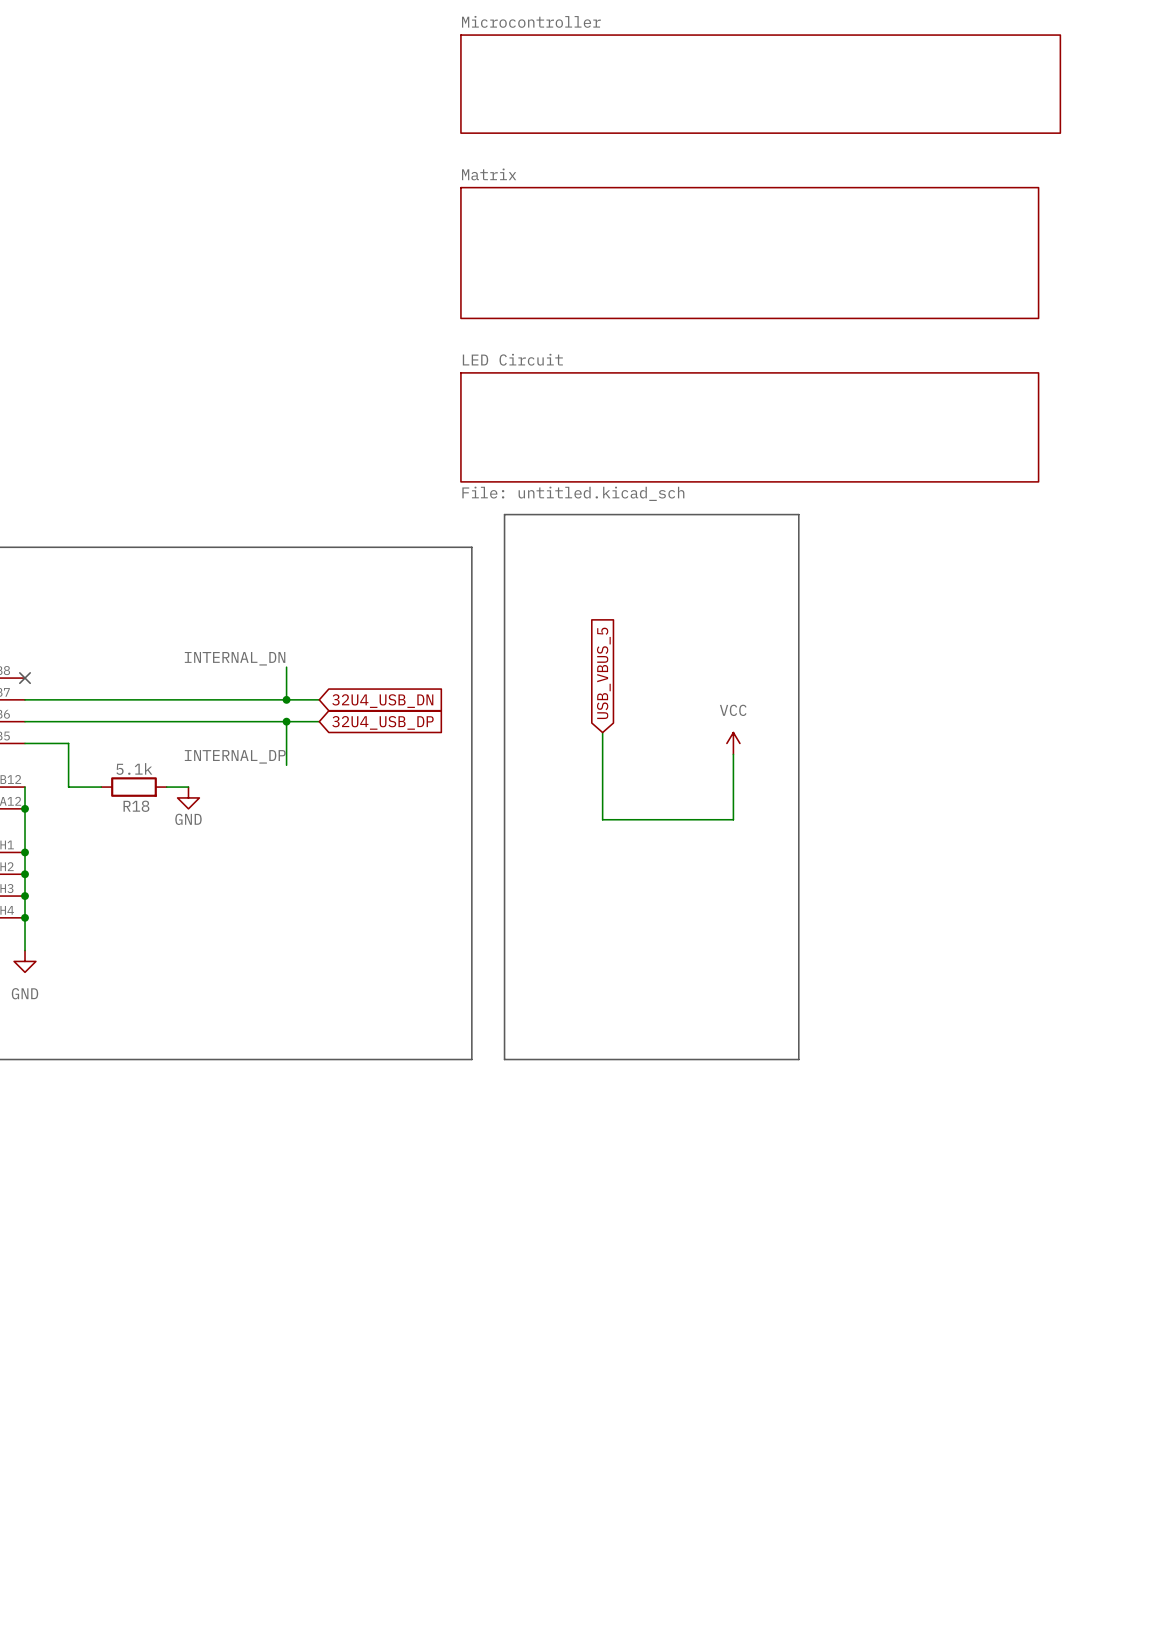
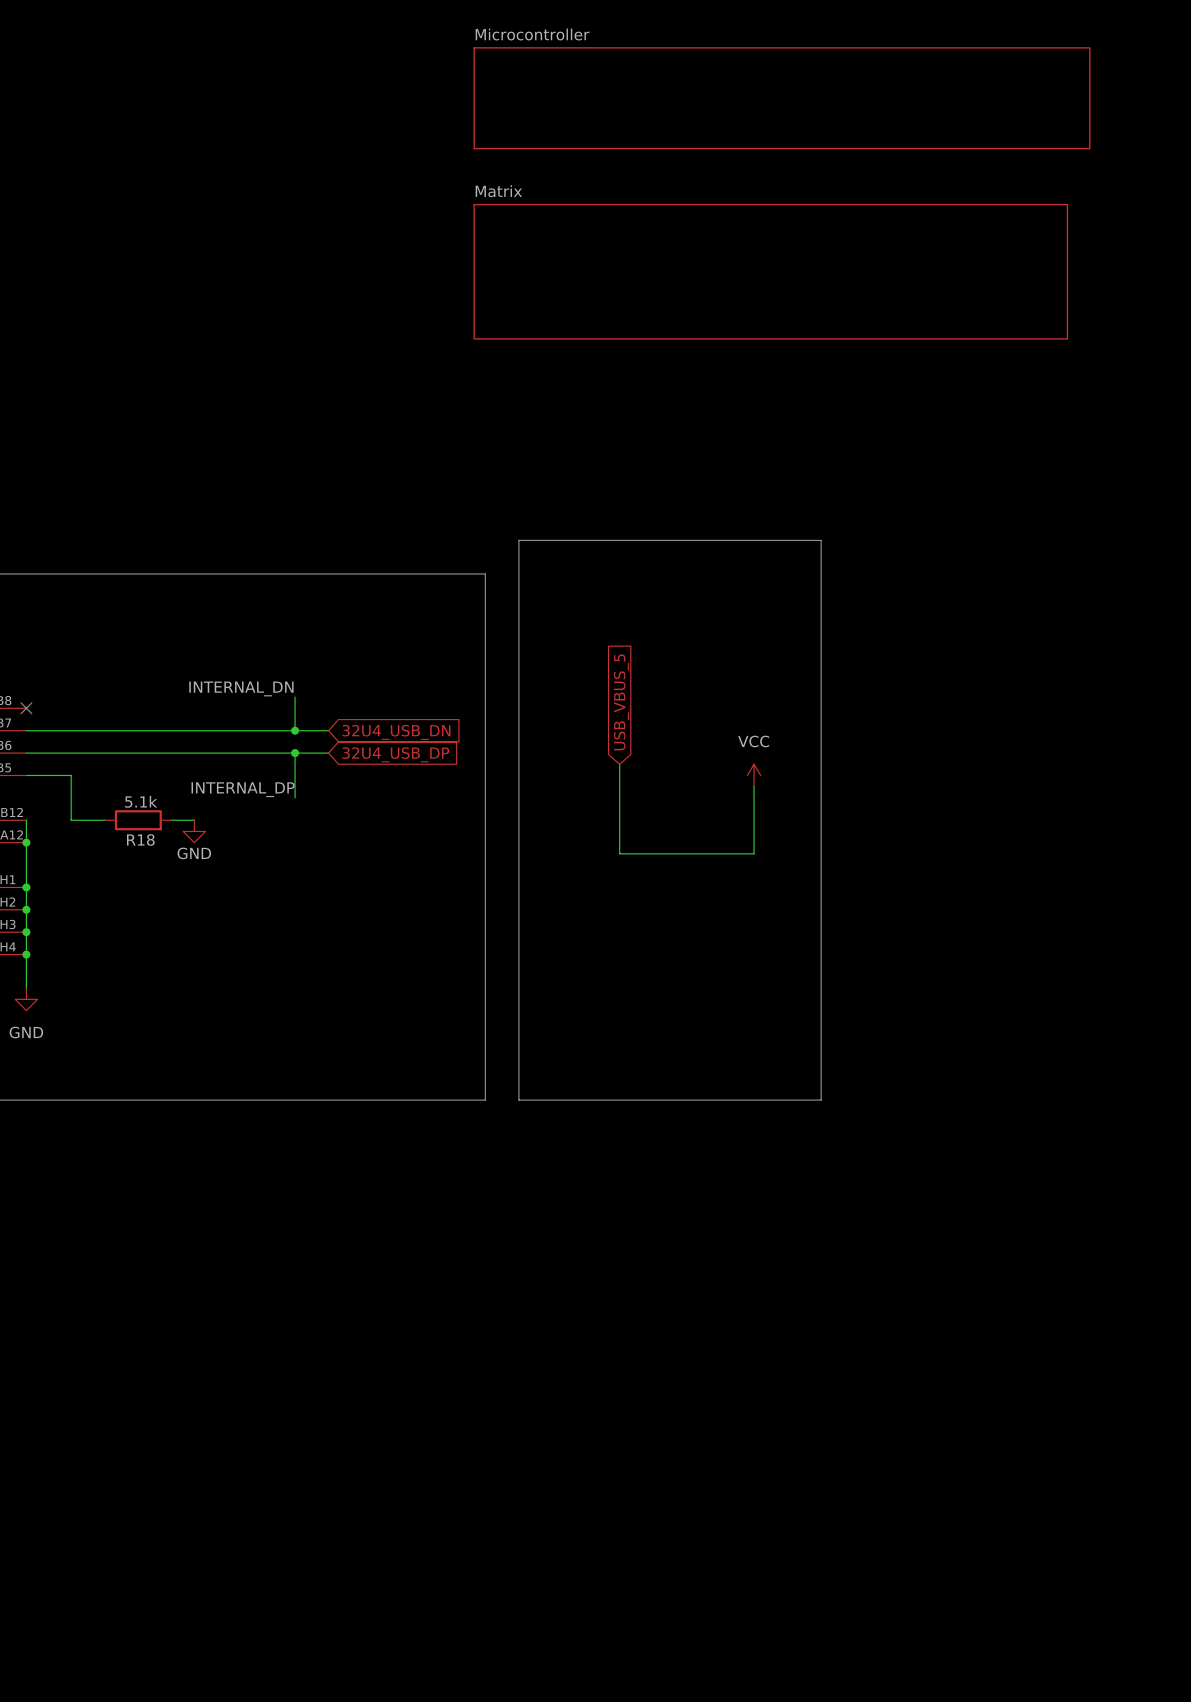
sheet LED Circuit: File: untitled.kicad_sch (749, 427) -> none
R18 value: 5.1k (134, 768) -> none
R18 text: none -> 5.1k (141, 801)

